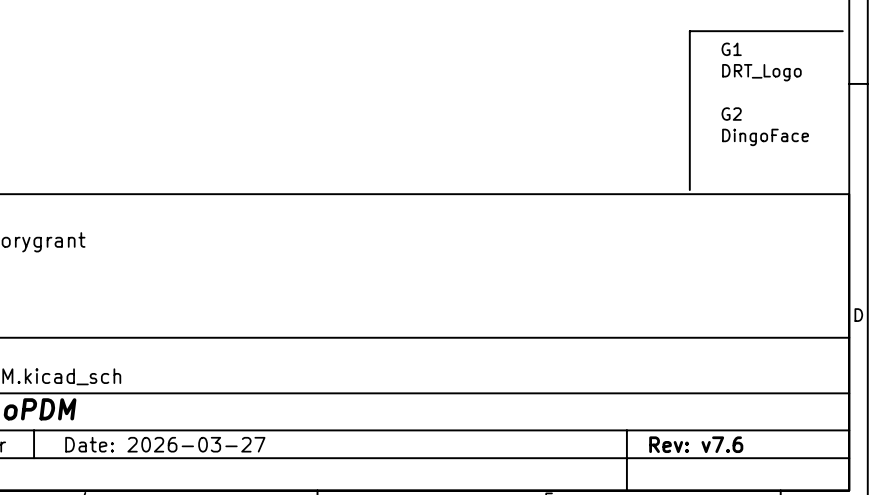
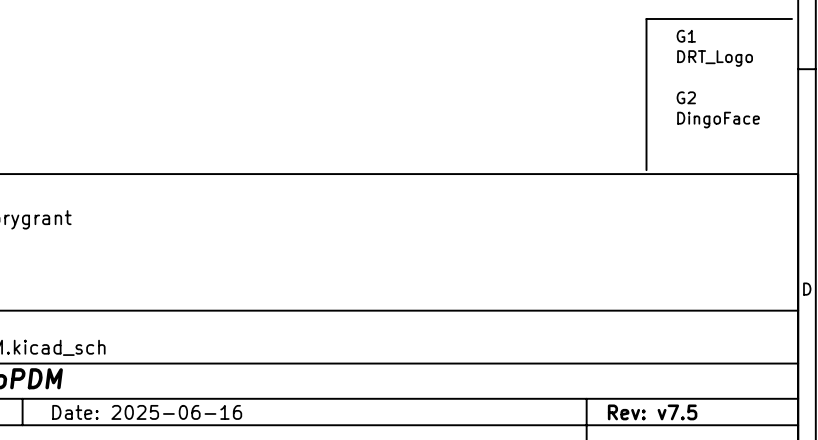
title block: Date: 2026-03-27 (165, 444) -> Date: 2025-06-16 (147, 412)
title block: Rev: v7.6 (696, 444) -> Rev: v7.5 (652, 412)

